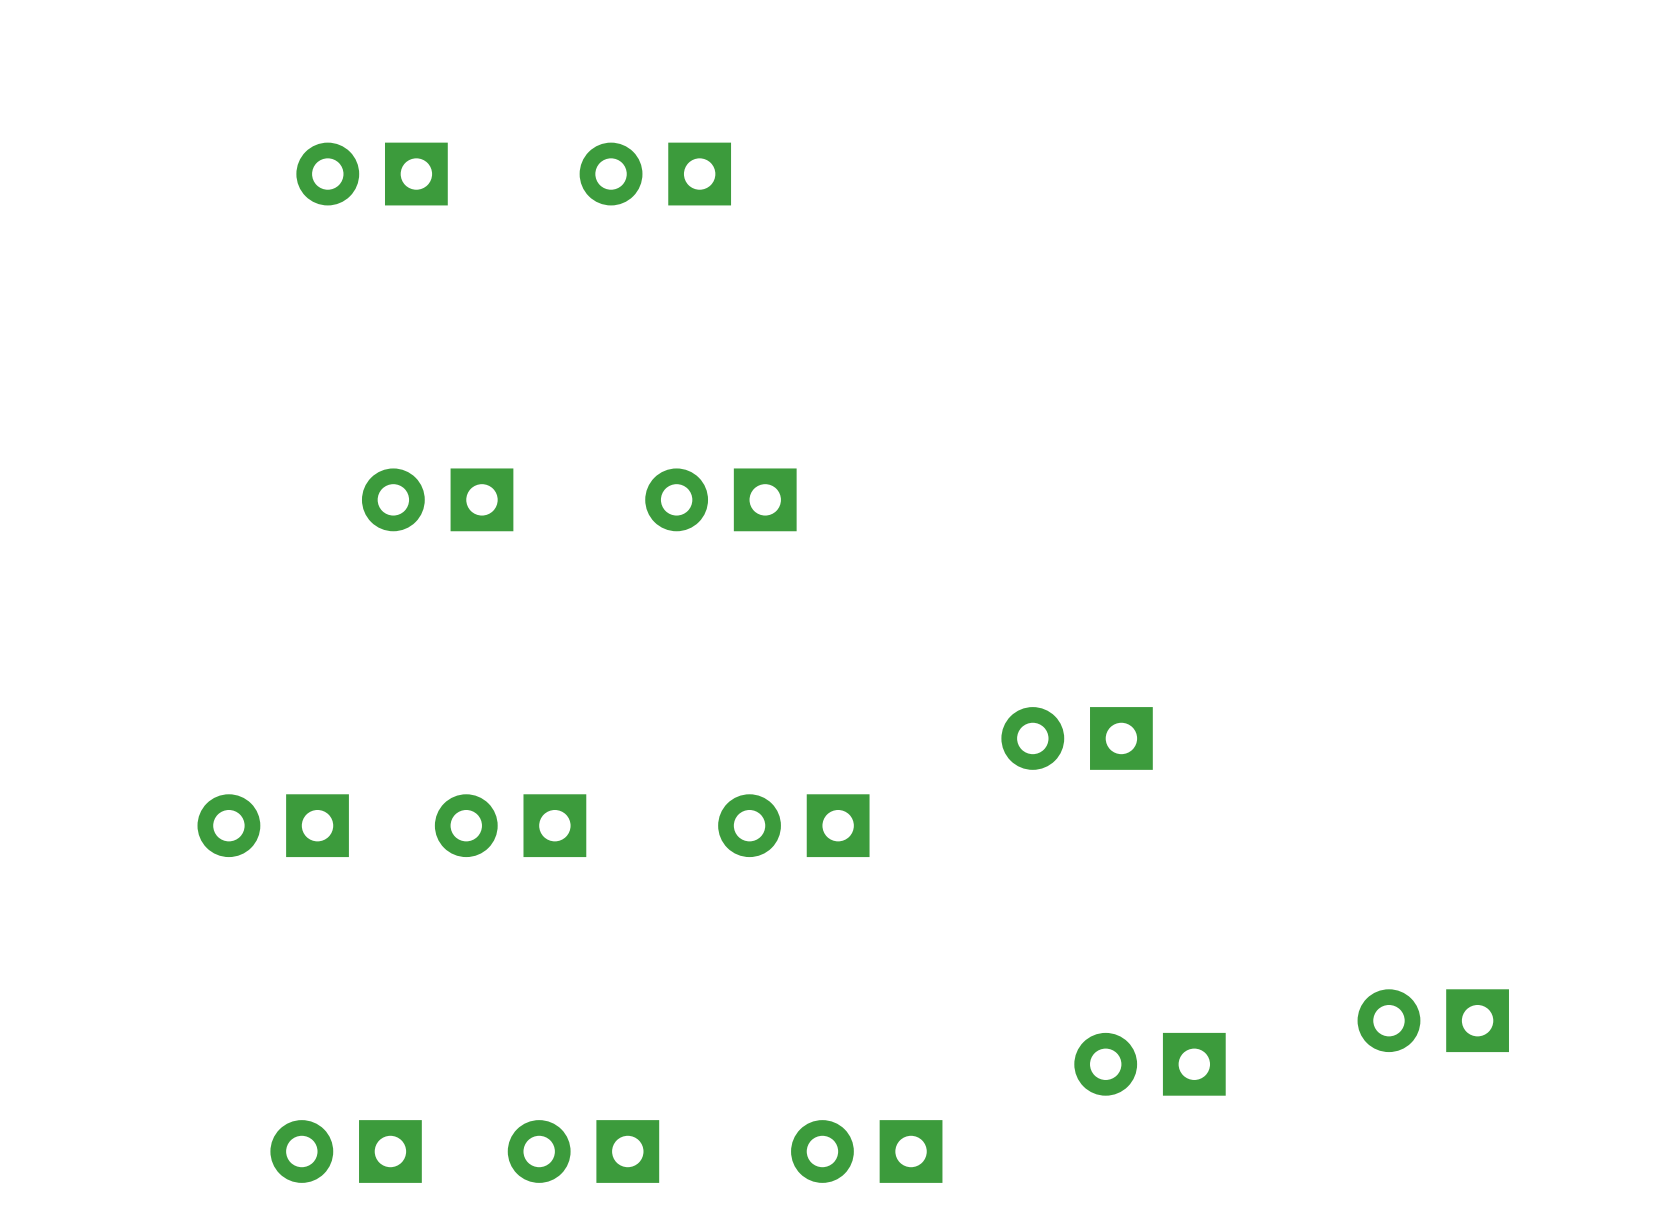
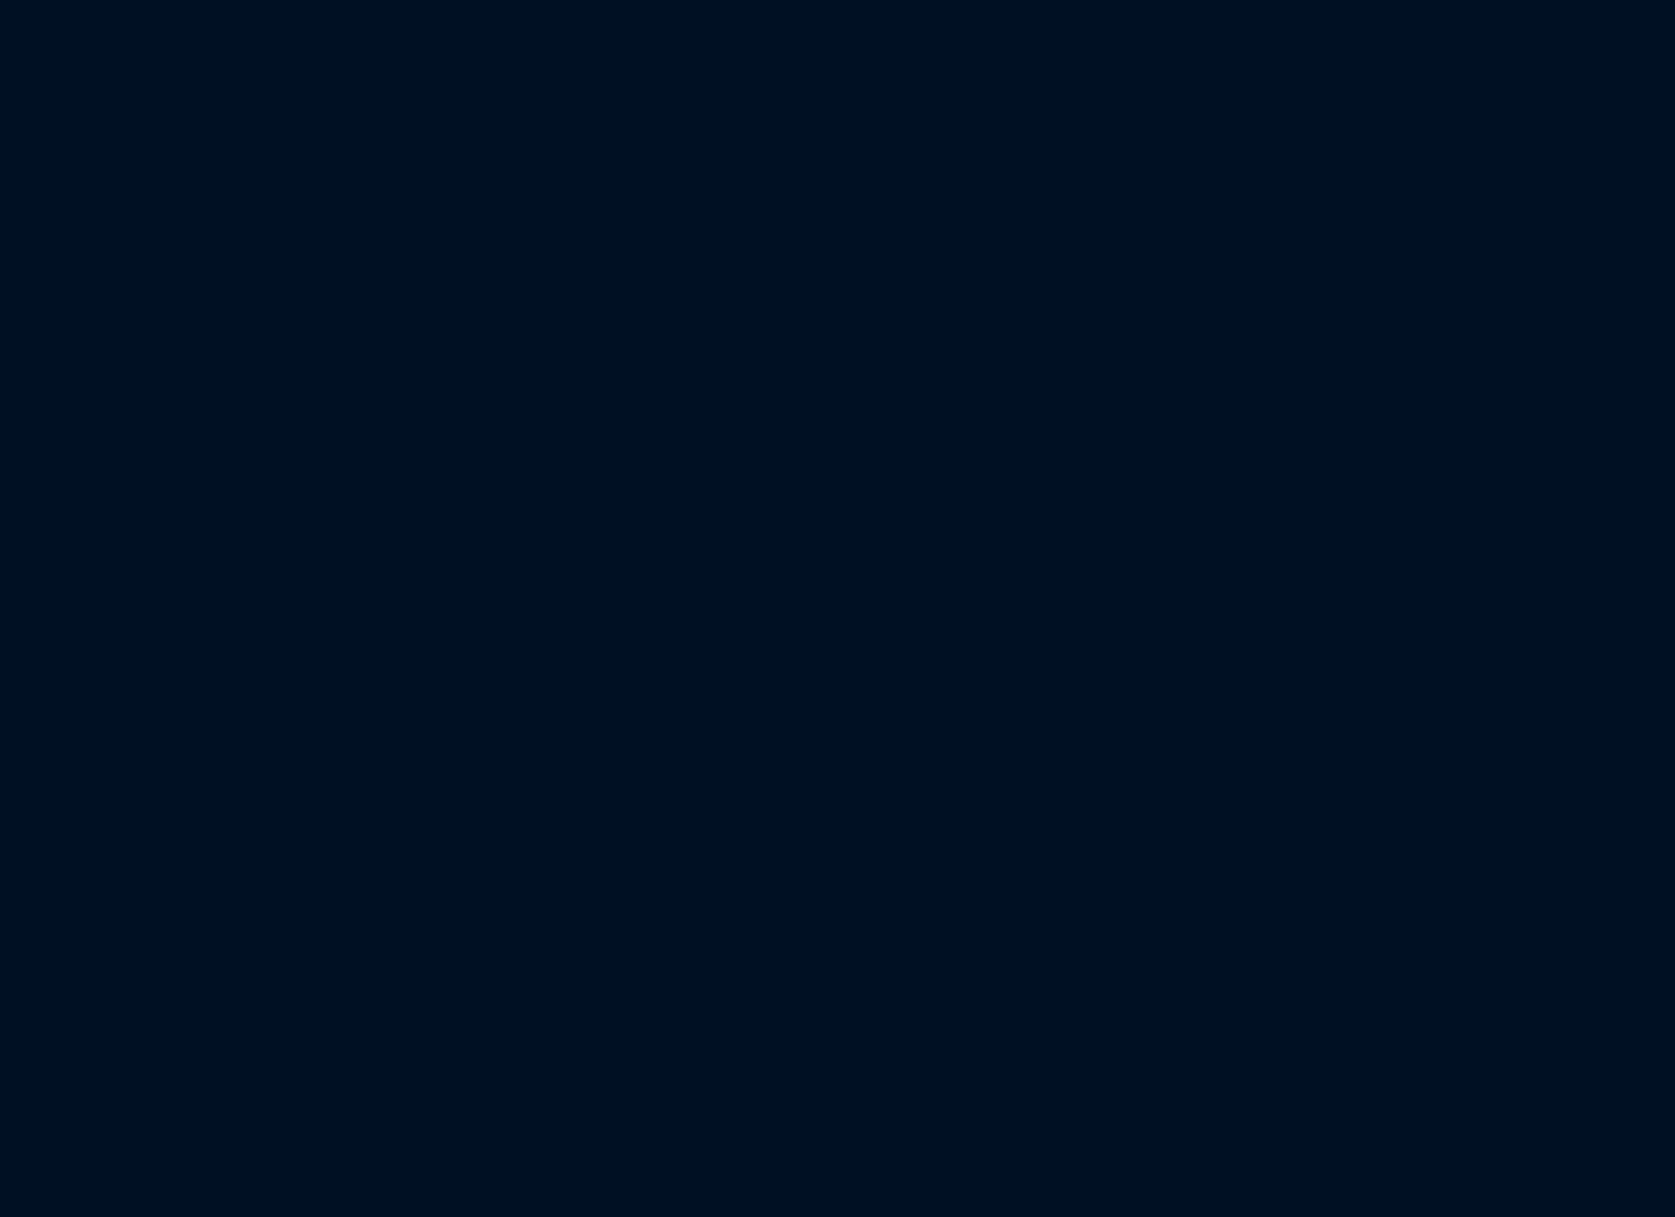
part: (372, 174) -> none
part: (655, 174) -> none
part: (437, 499) -> none
part: (720, 499) -> none
part: (1077, 738) -> none
part: (273, 825) -> none
part: (510, 825) -> none
part: (793, 825) -> none
part: (1433, 1020) -> none
part: (1150, 1064) -> none
part: (346, 1151) -> none
part: (583, 1151) -> none
part: (866, 1151) -> none

